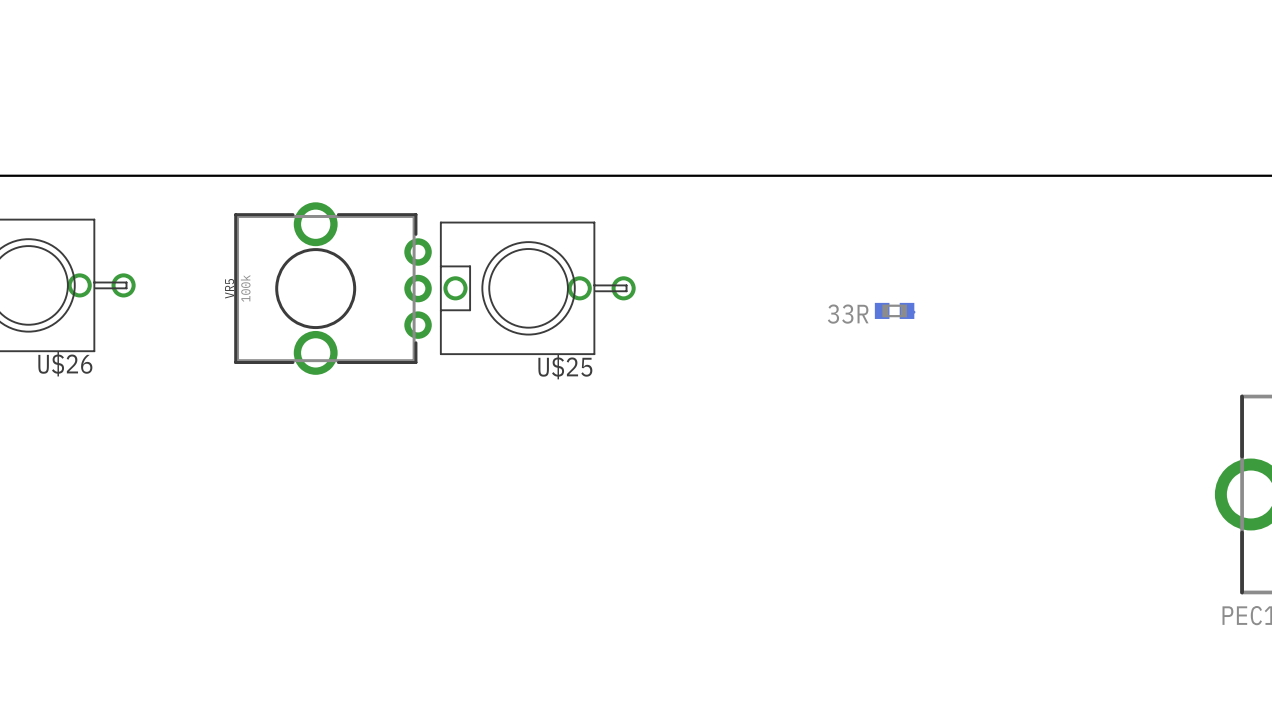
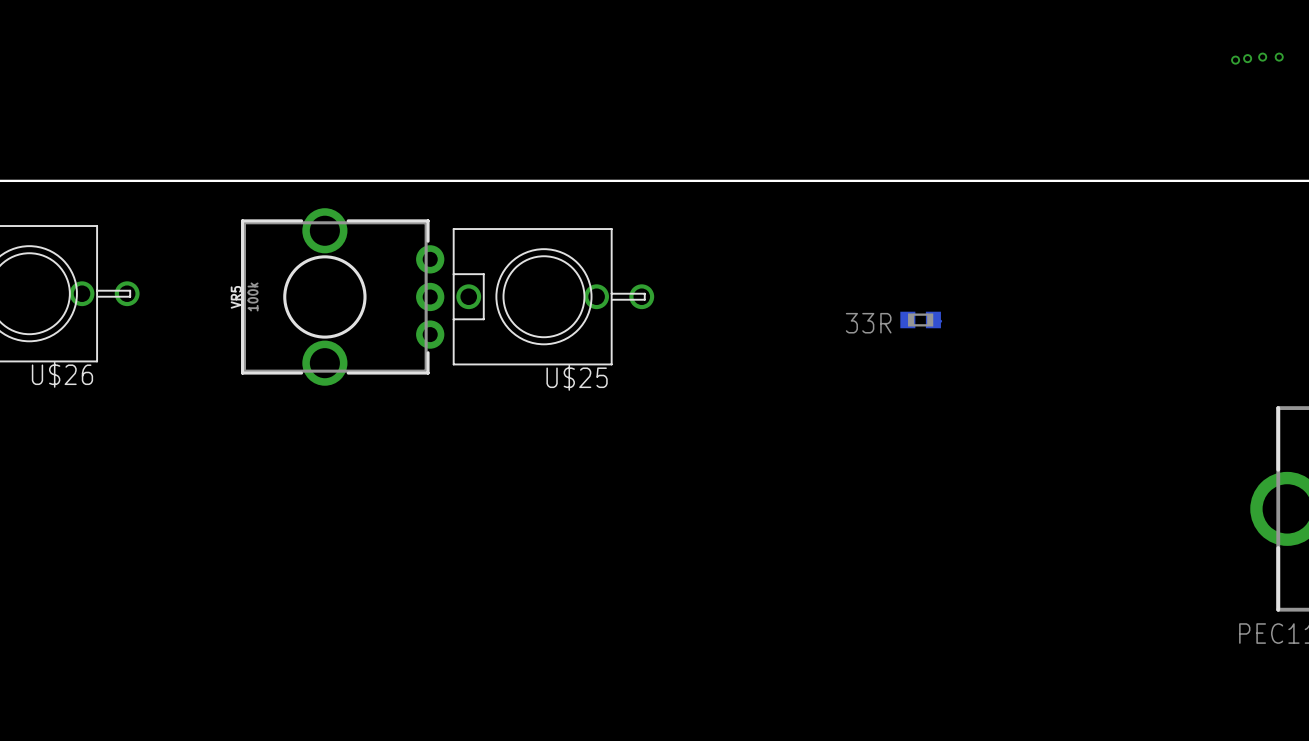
via: none -> (1262, 57)
via: none -> (1279, 57)
via: none -> (1247, 58)
via: none -> (1235, 60)

